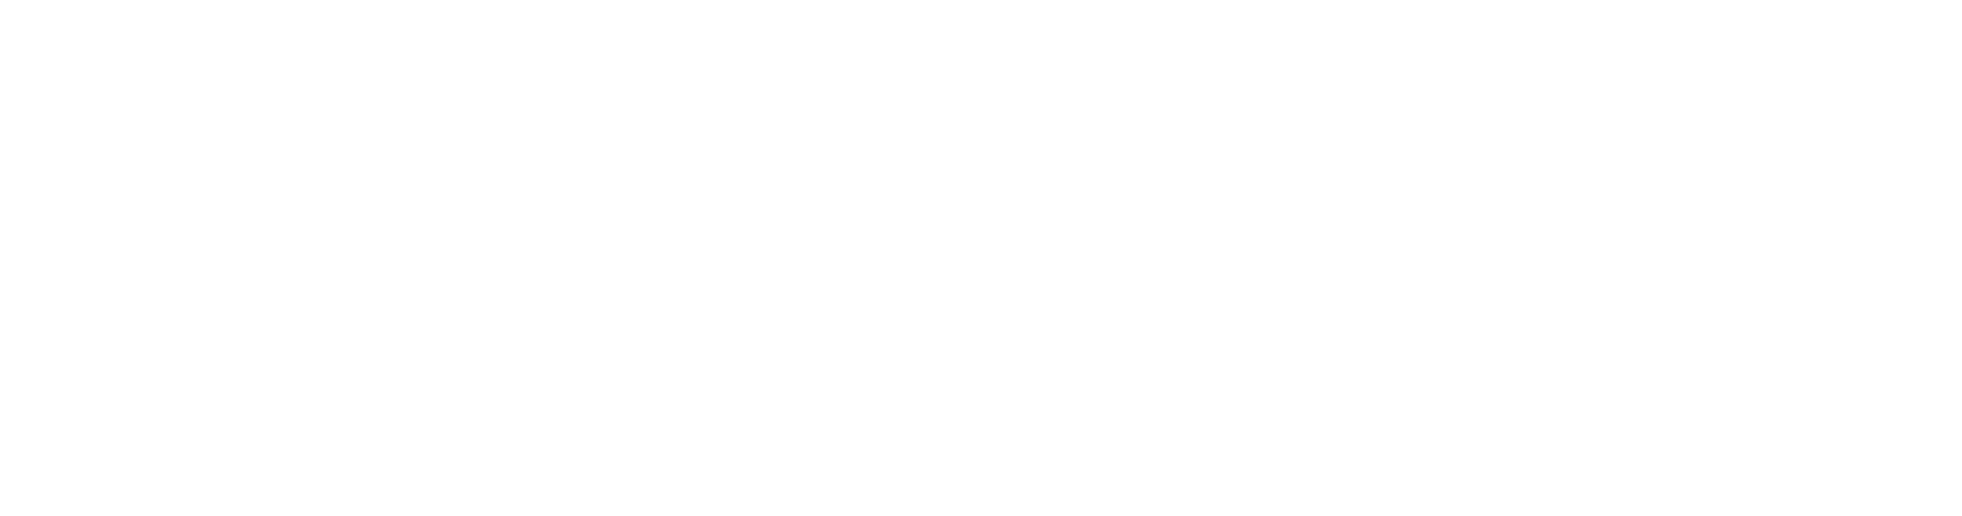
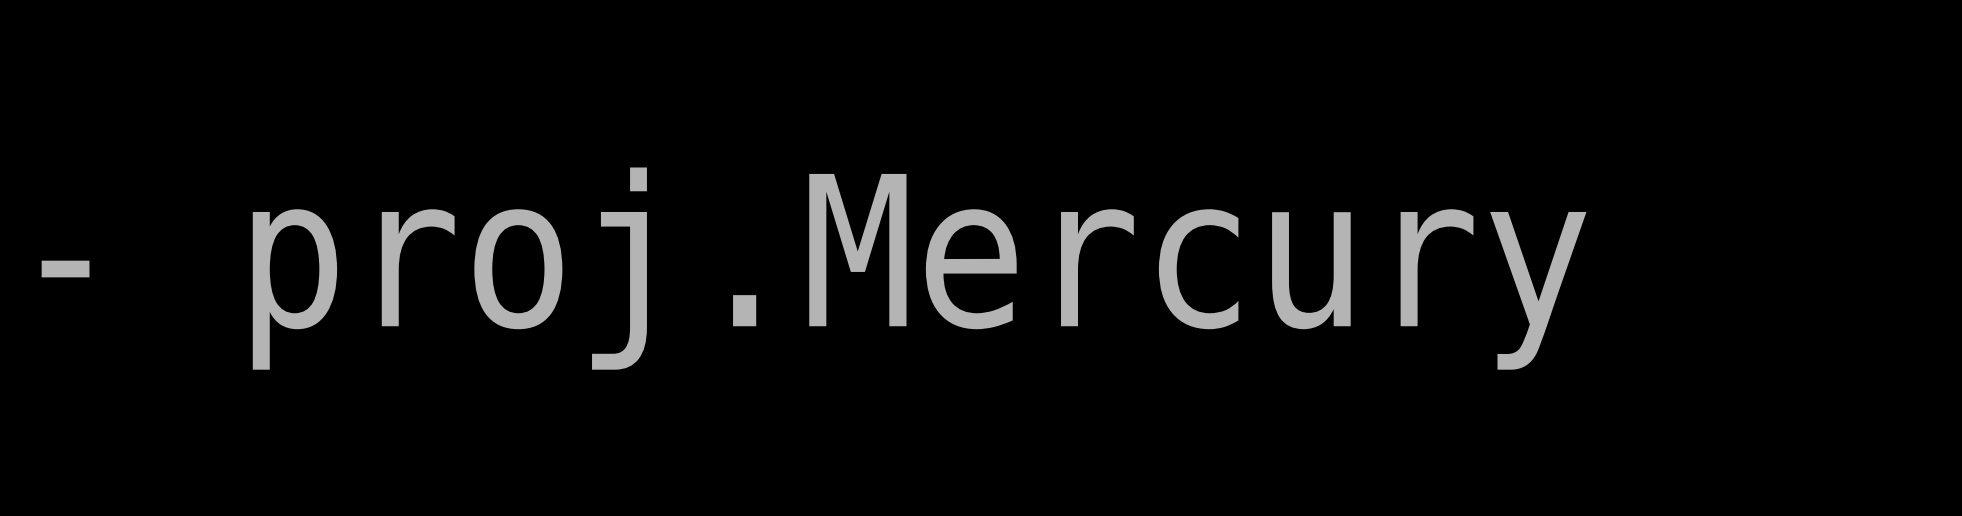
text: none -> - proj.Mercury (814, 268)

